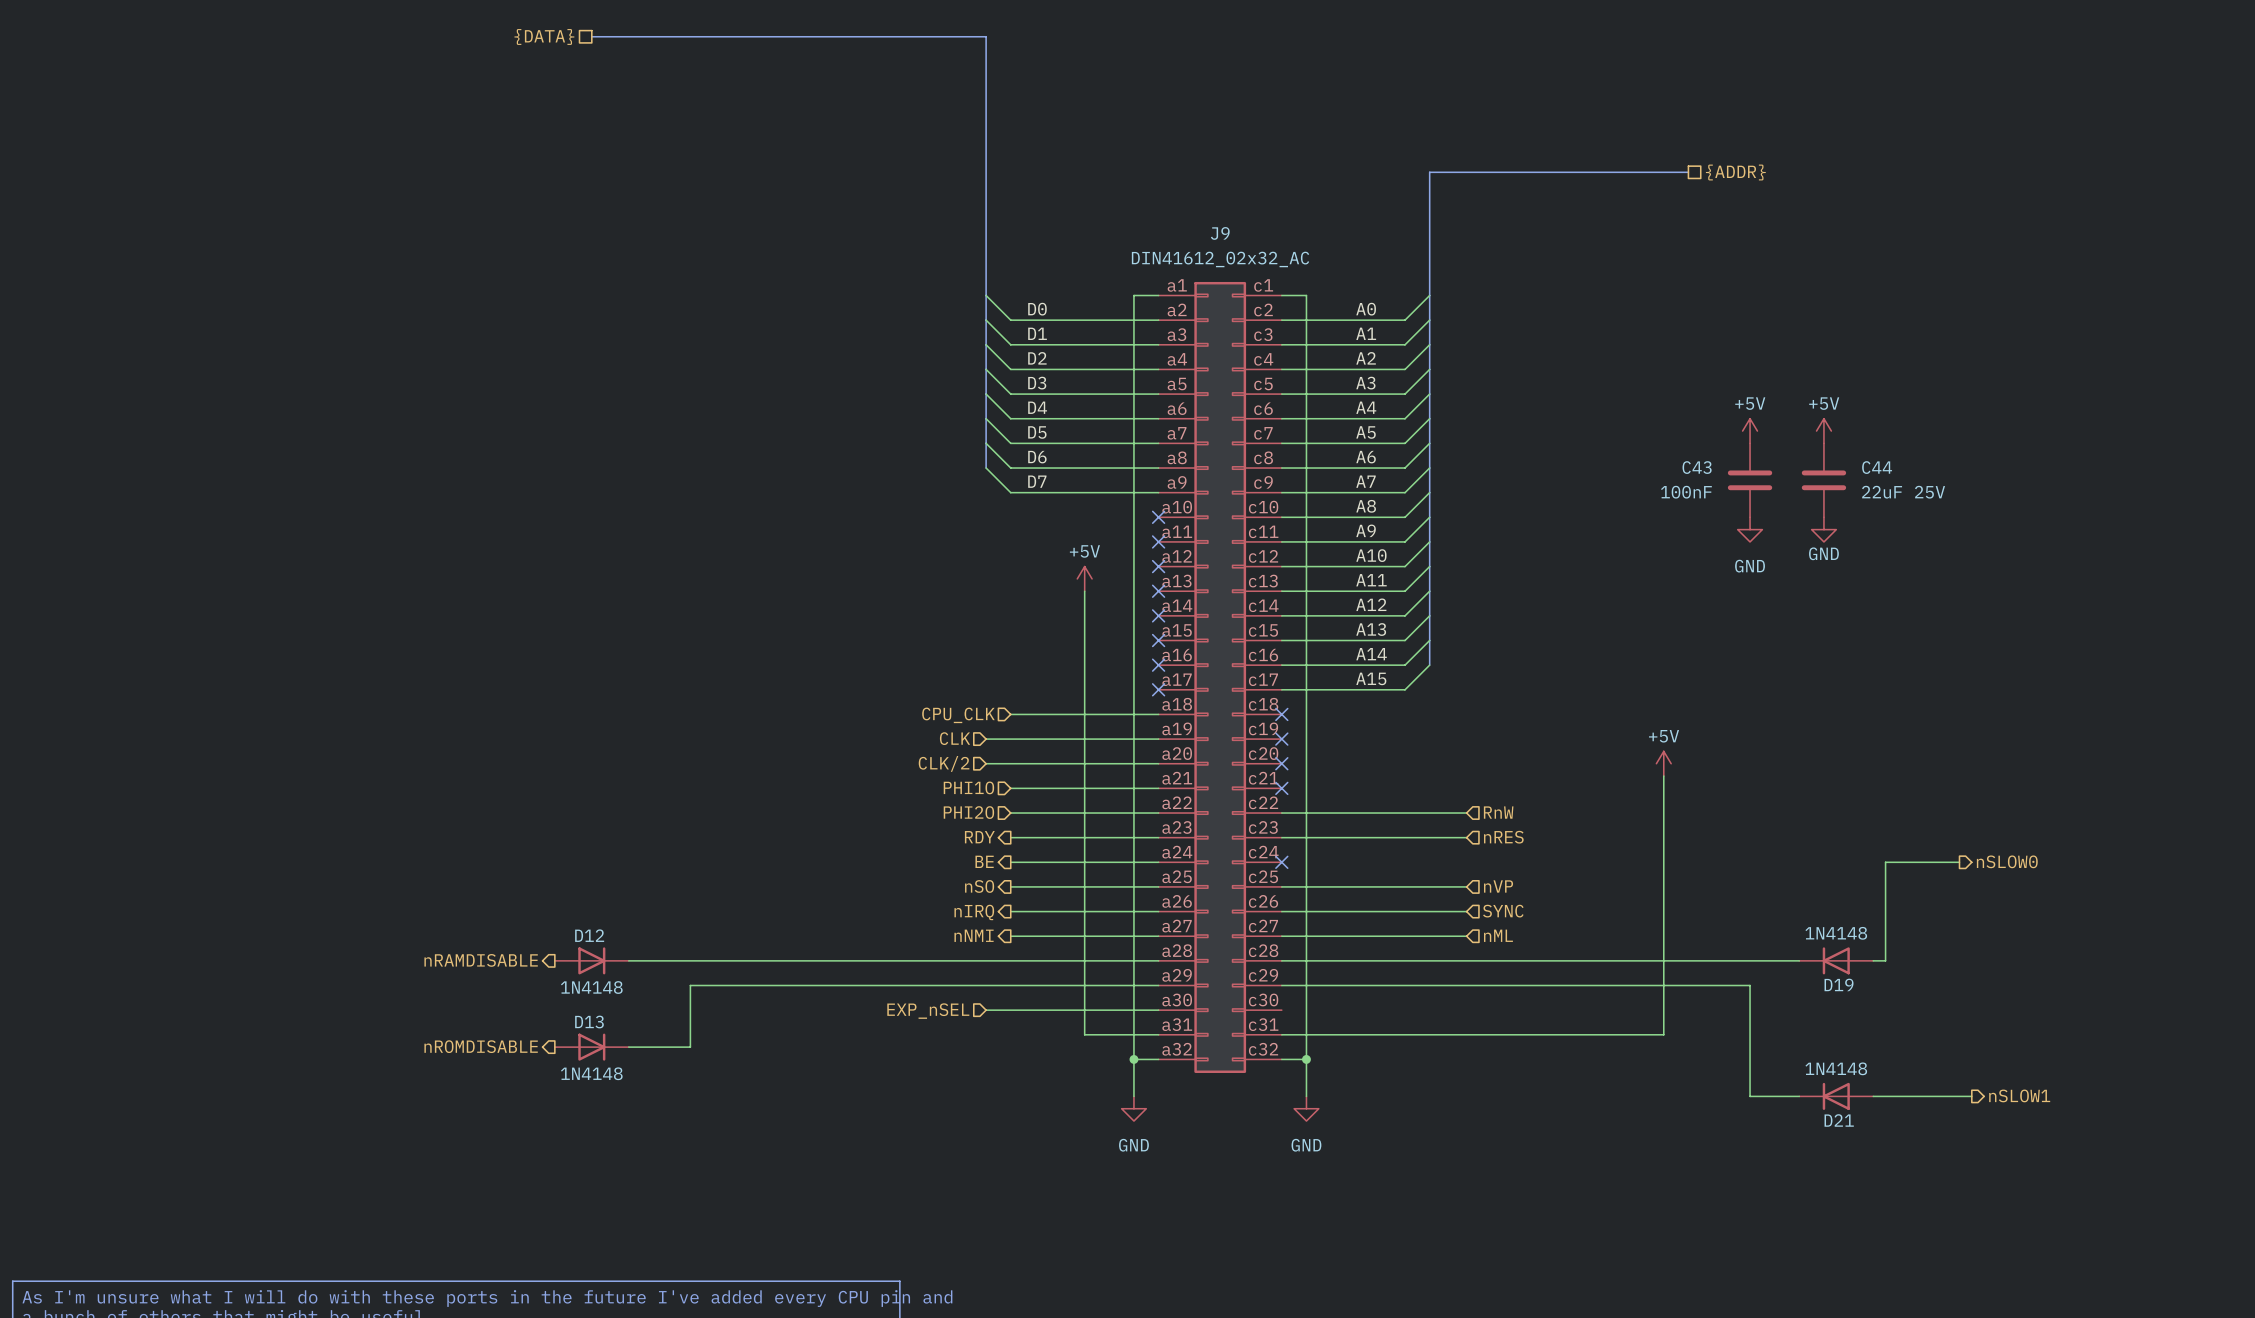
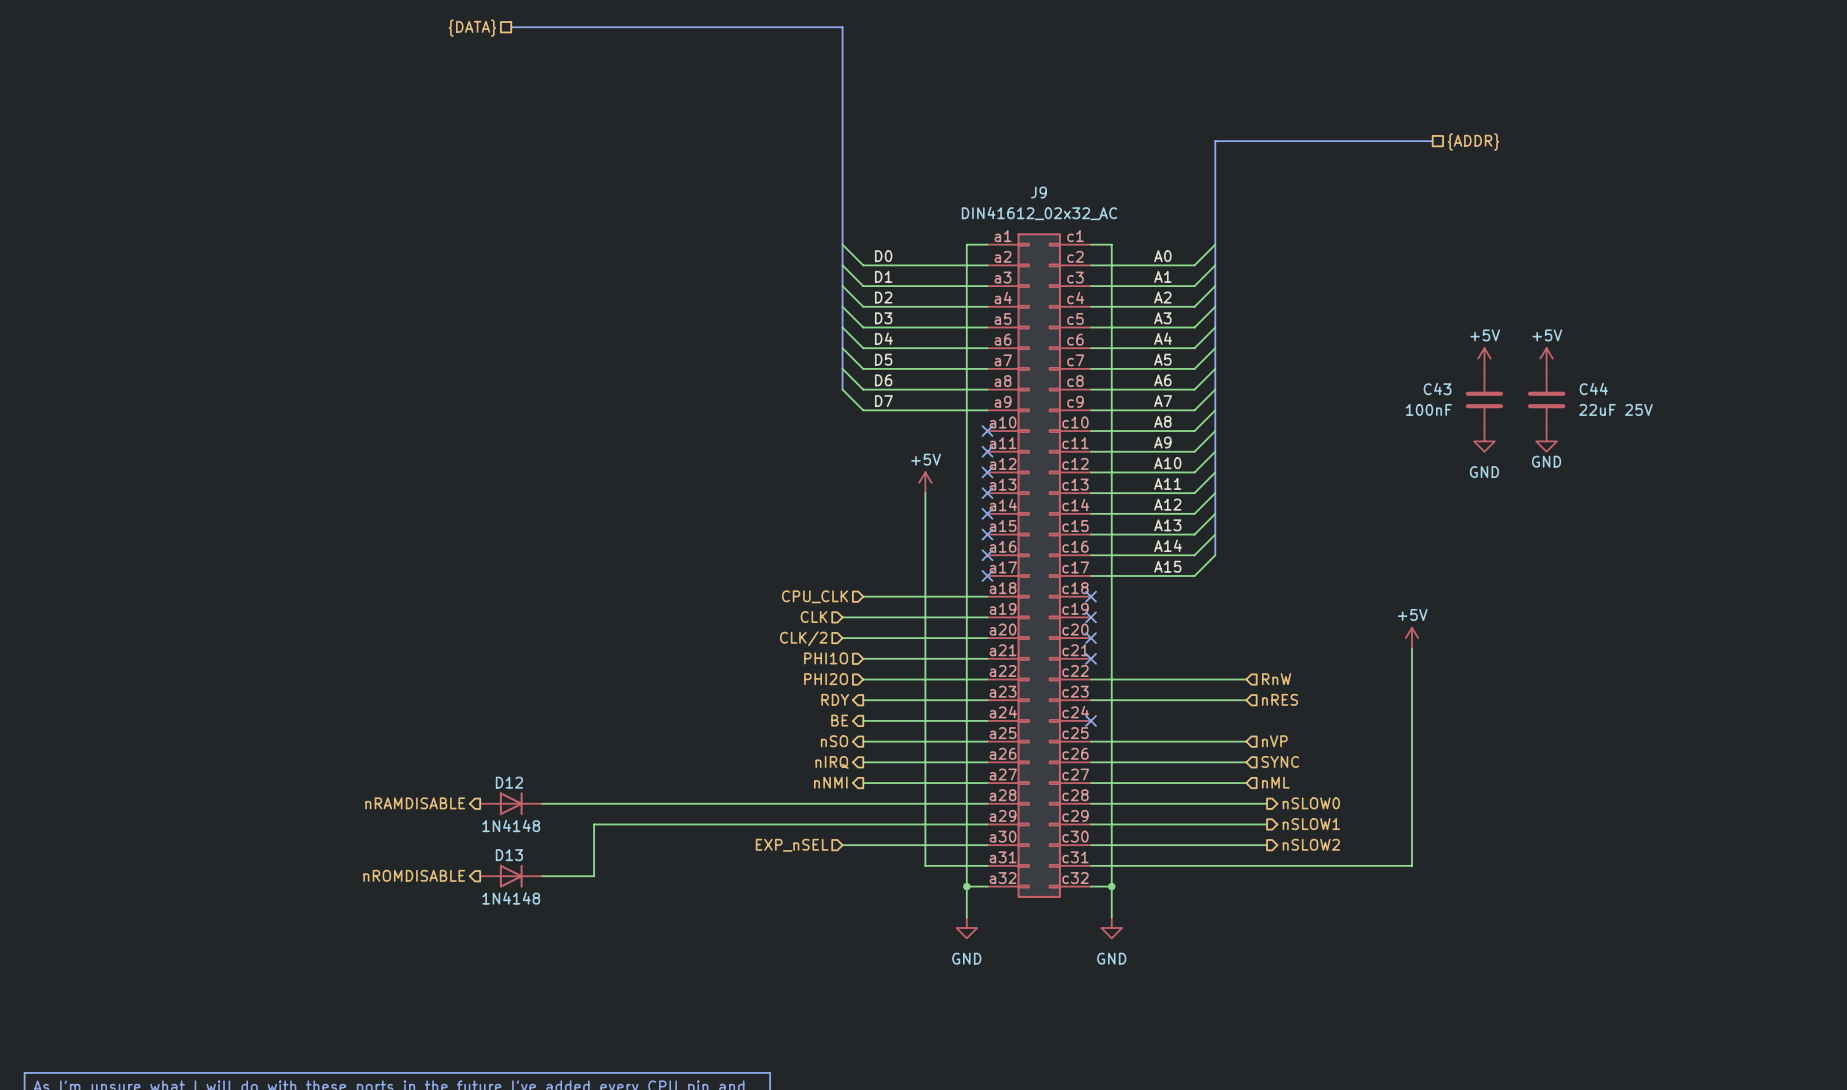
hierarchical label: nSLOW0 (2007, 861) -> none
wire: (1959, 862) (1885, 862) (1885, 960) (1873, 960) -> none
wire: (1491, 960) (1799, 960) -> none
hierarchical label: none -> nSLOW0 (1311, 803)
D19: 1N4148 (1836, 960) -> none
wire: (1491, 985) (1750, 985) (1750, 1096) (1799, 1096) -> none
hierarchical label: none -> nSLOW1 (1311, 824)
hierarchical label: none -> nSLOW2 (1311, 844)
wire: none -> (1091, 845) (1267, 845)
hierarchical label: nSLOW1 (2019, 1095) -> none
D21: 1N4148 (1836, 1096) -> none
wire: (1873, 1096) (1971, 1096) -> none

